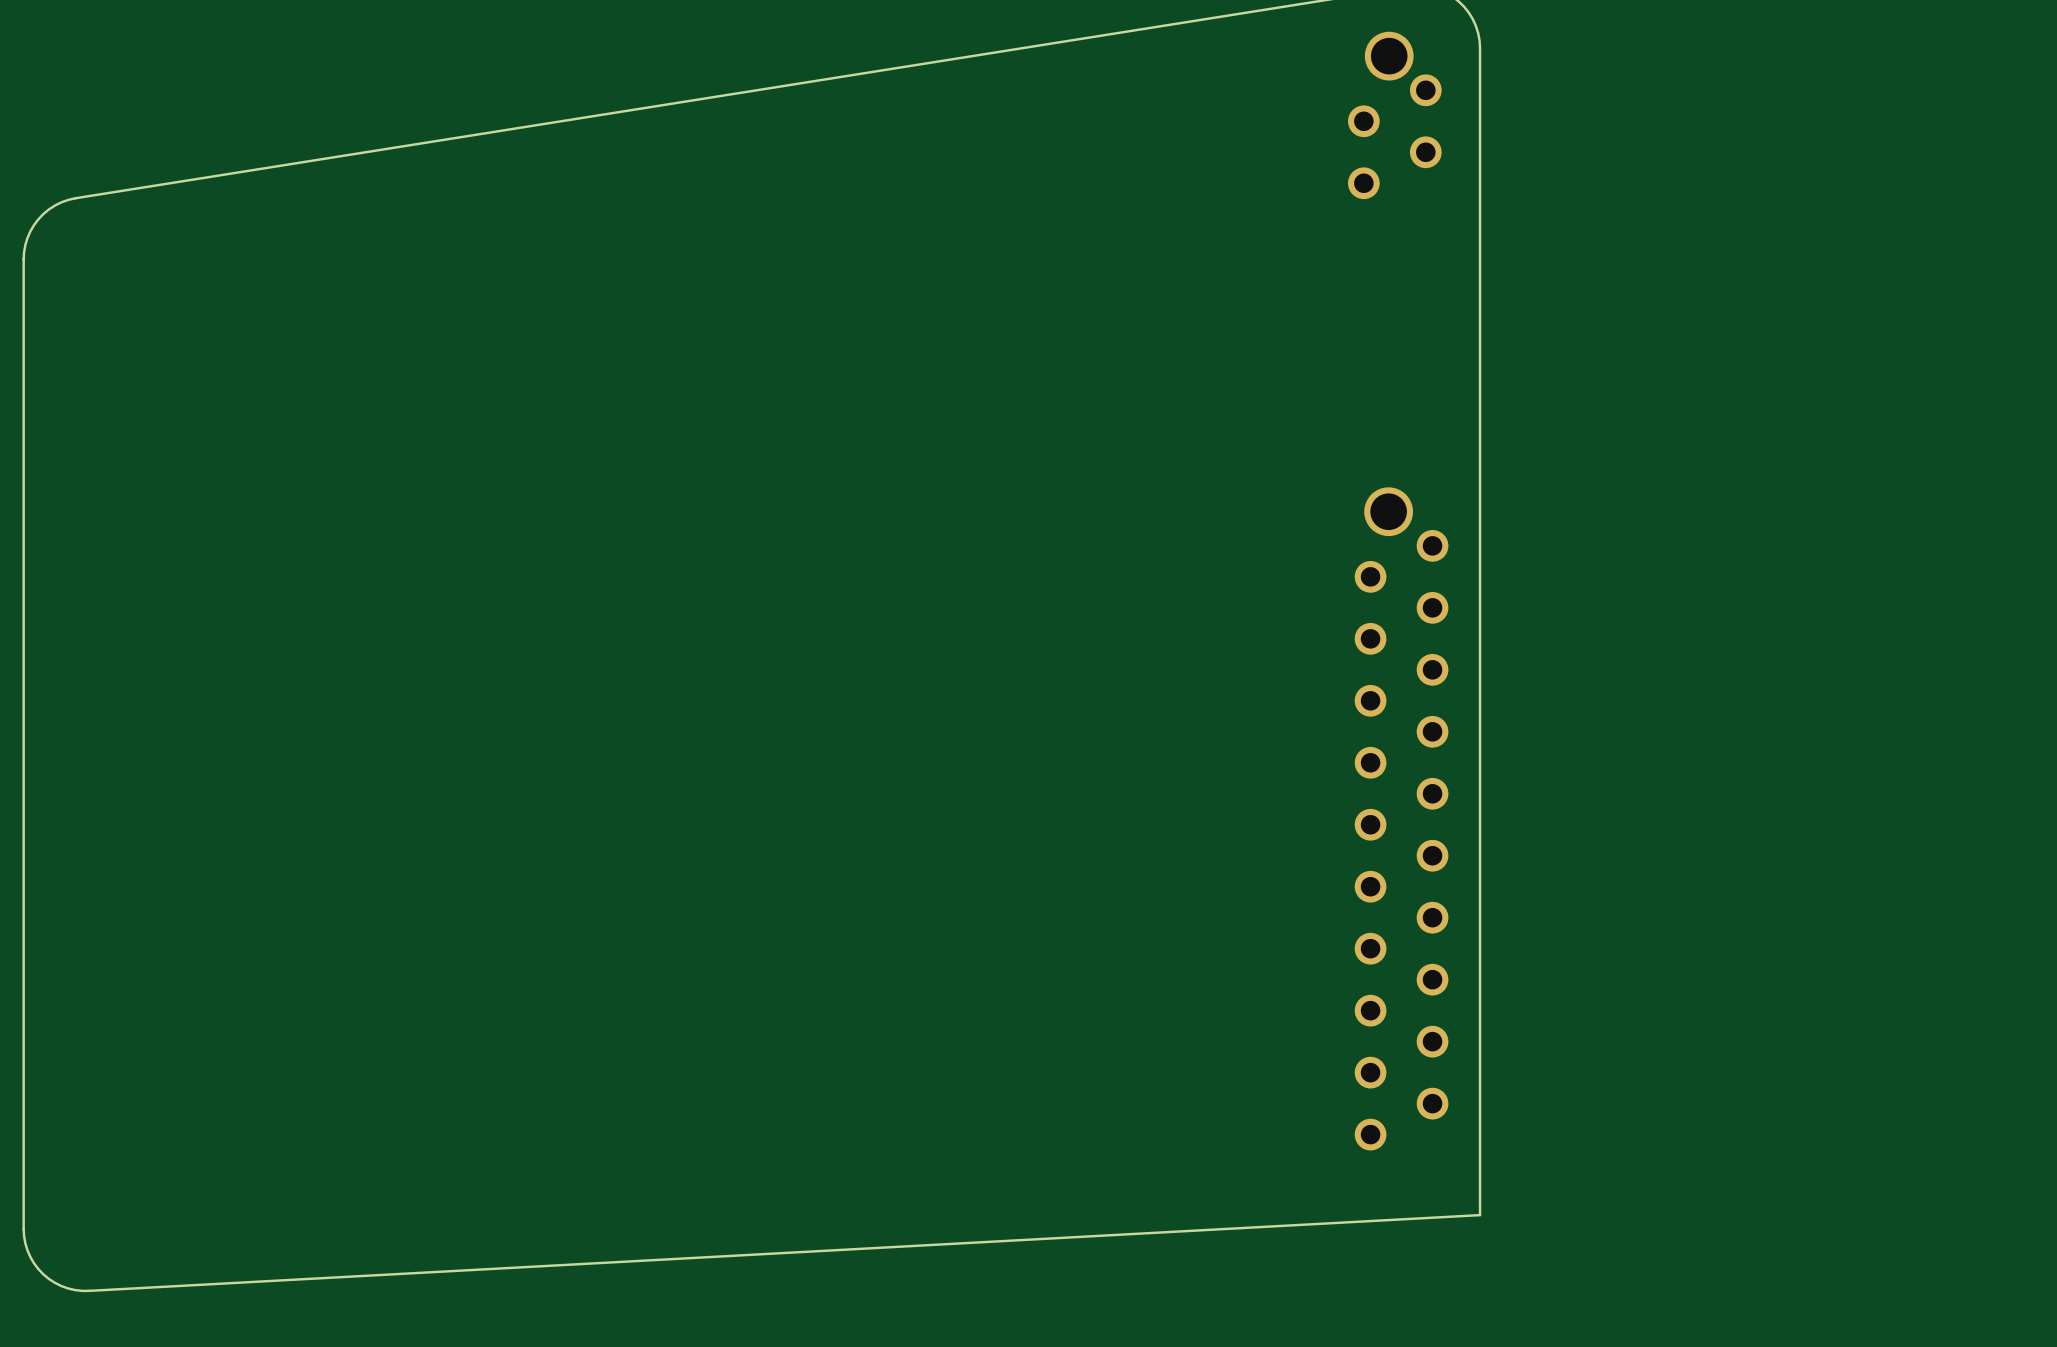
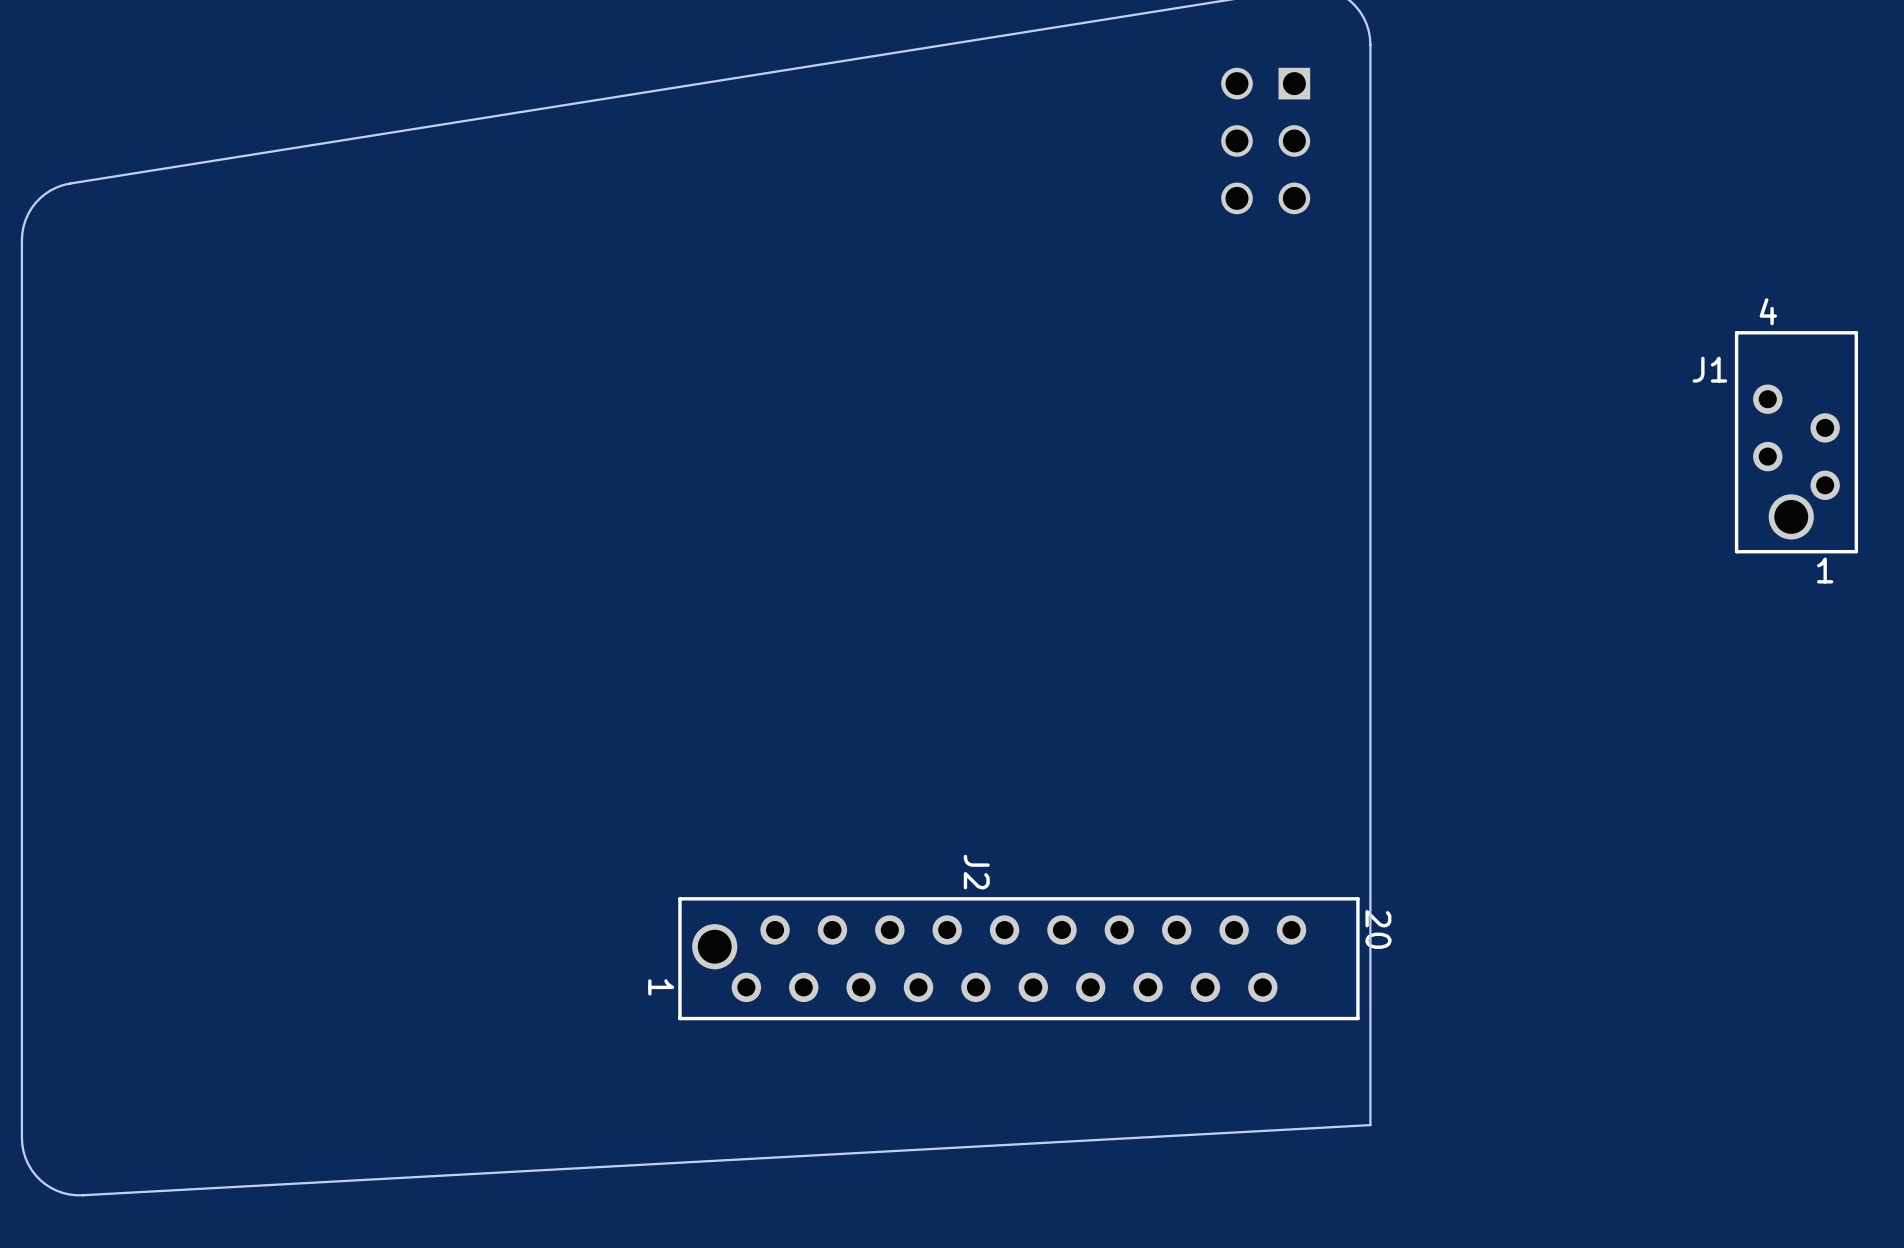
part: (1394, 115) -> none
part: none -> (1265, 140)
J1: none -> (1796, 442)
J2 side: top (1401, 818) -> bottom (1018, 958)

